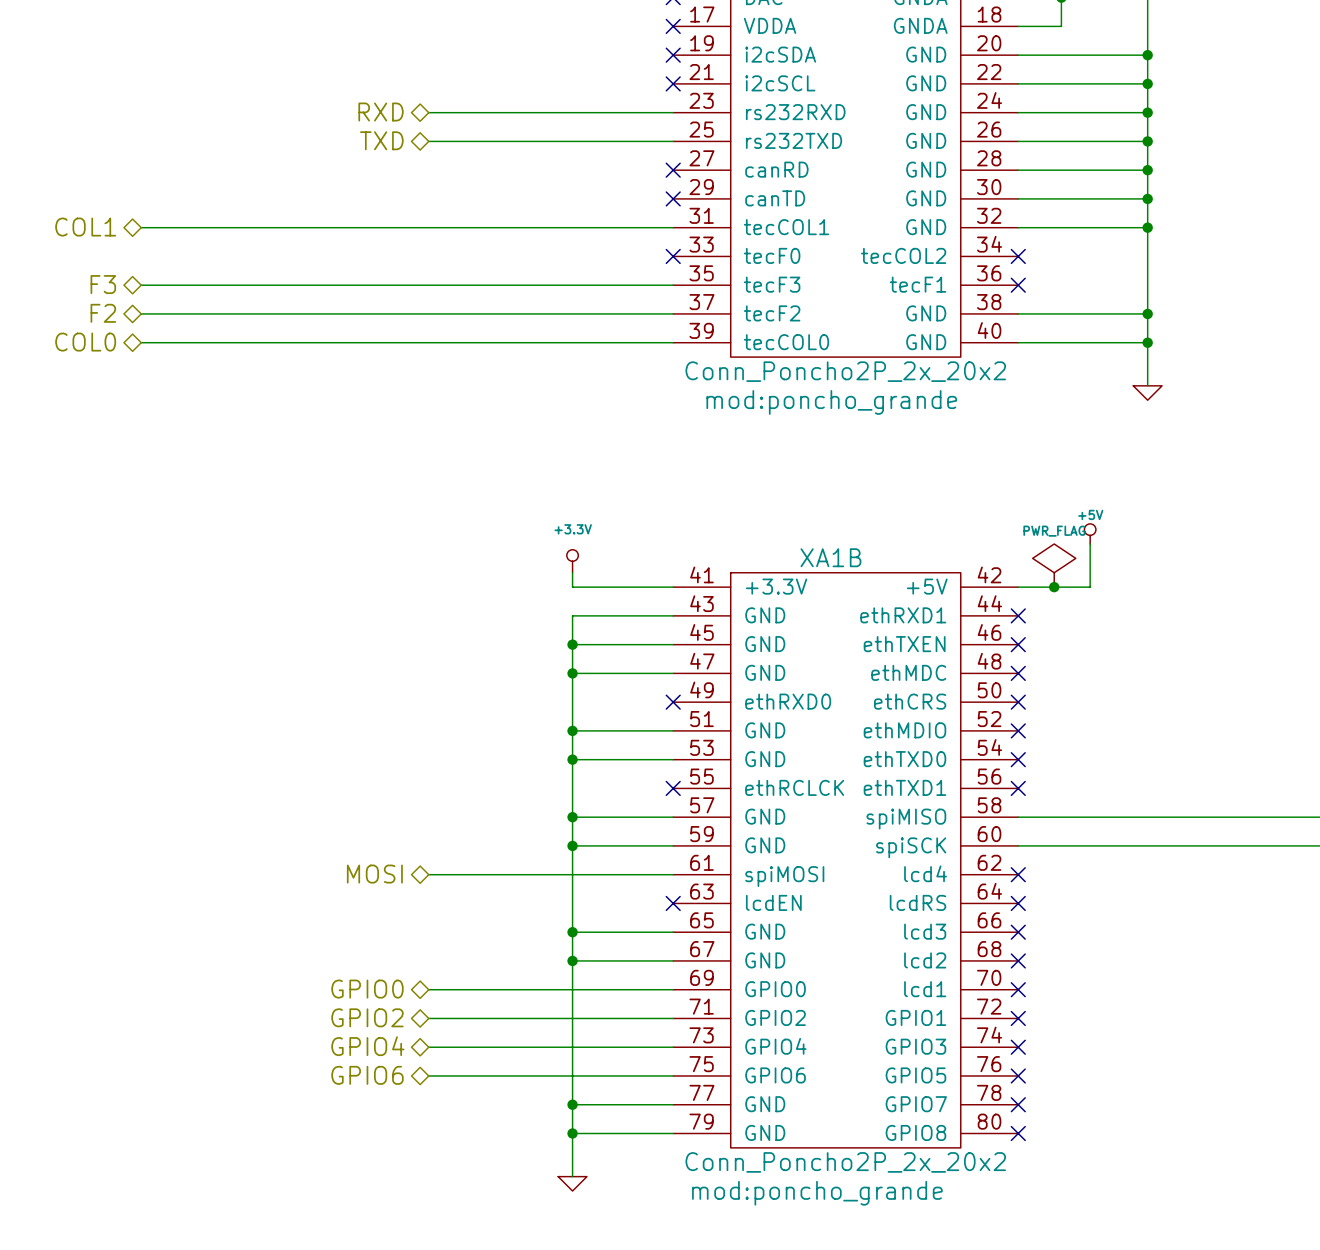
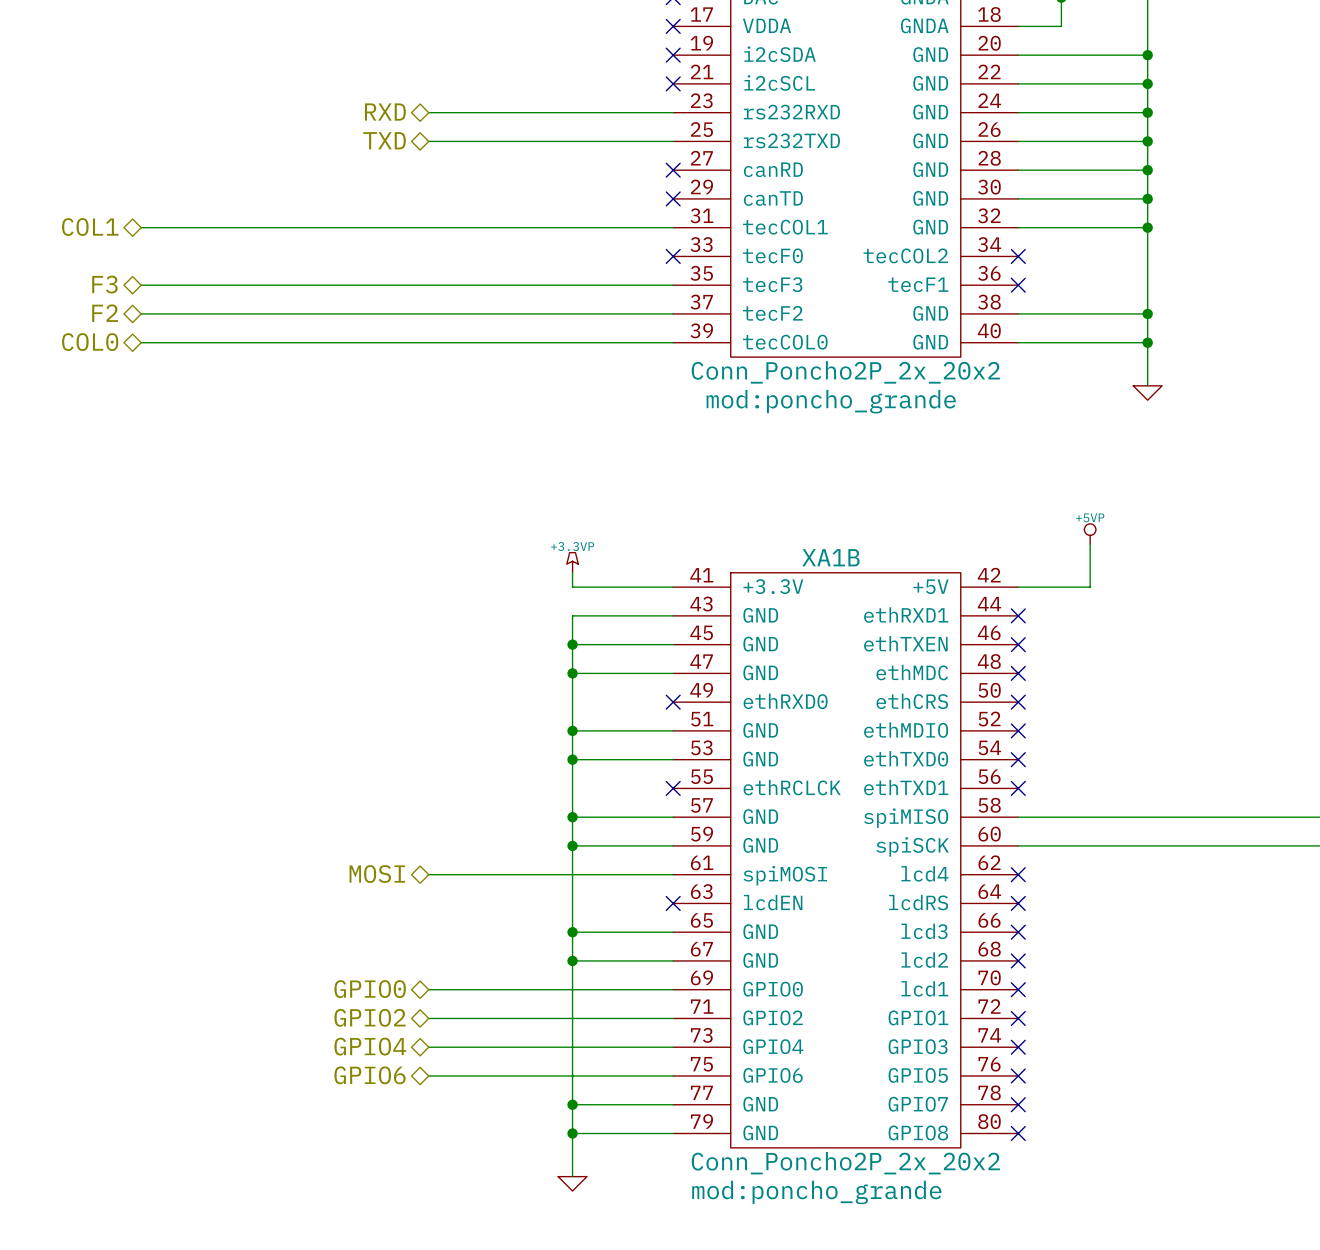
power symbol: +5V (1090, 533) -> +5VP (1090, 533)
power symbol: +3.3V (572, 561) -> +3.3VP (572, 562)
power symbol: PWR_FLAG (1054, 565) -> none
junction: (1054, 587) -> none

